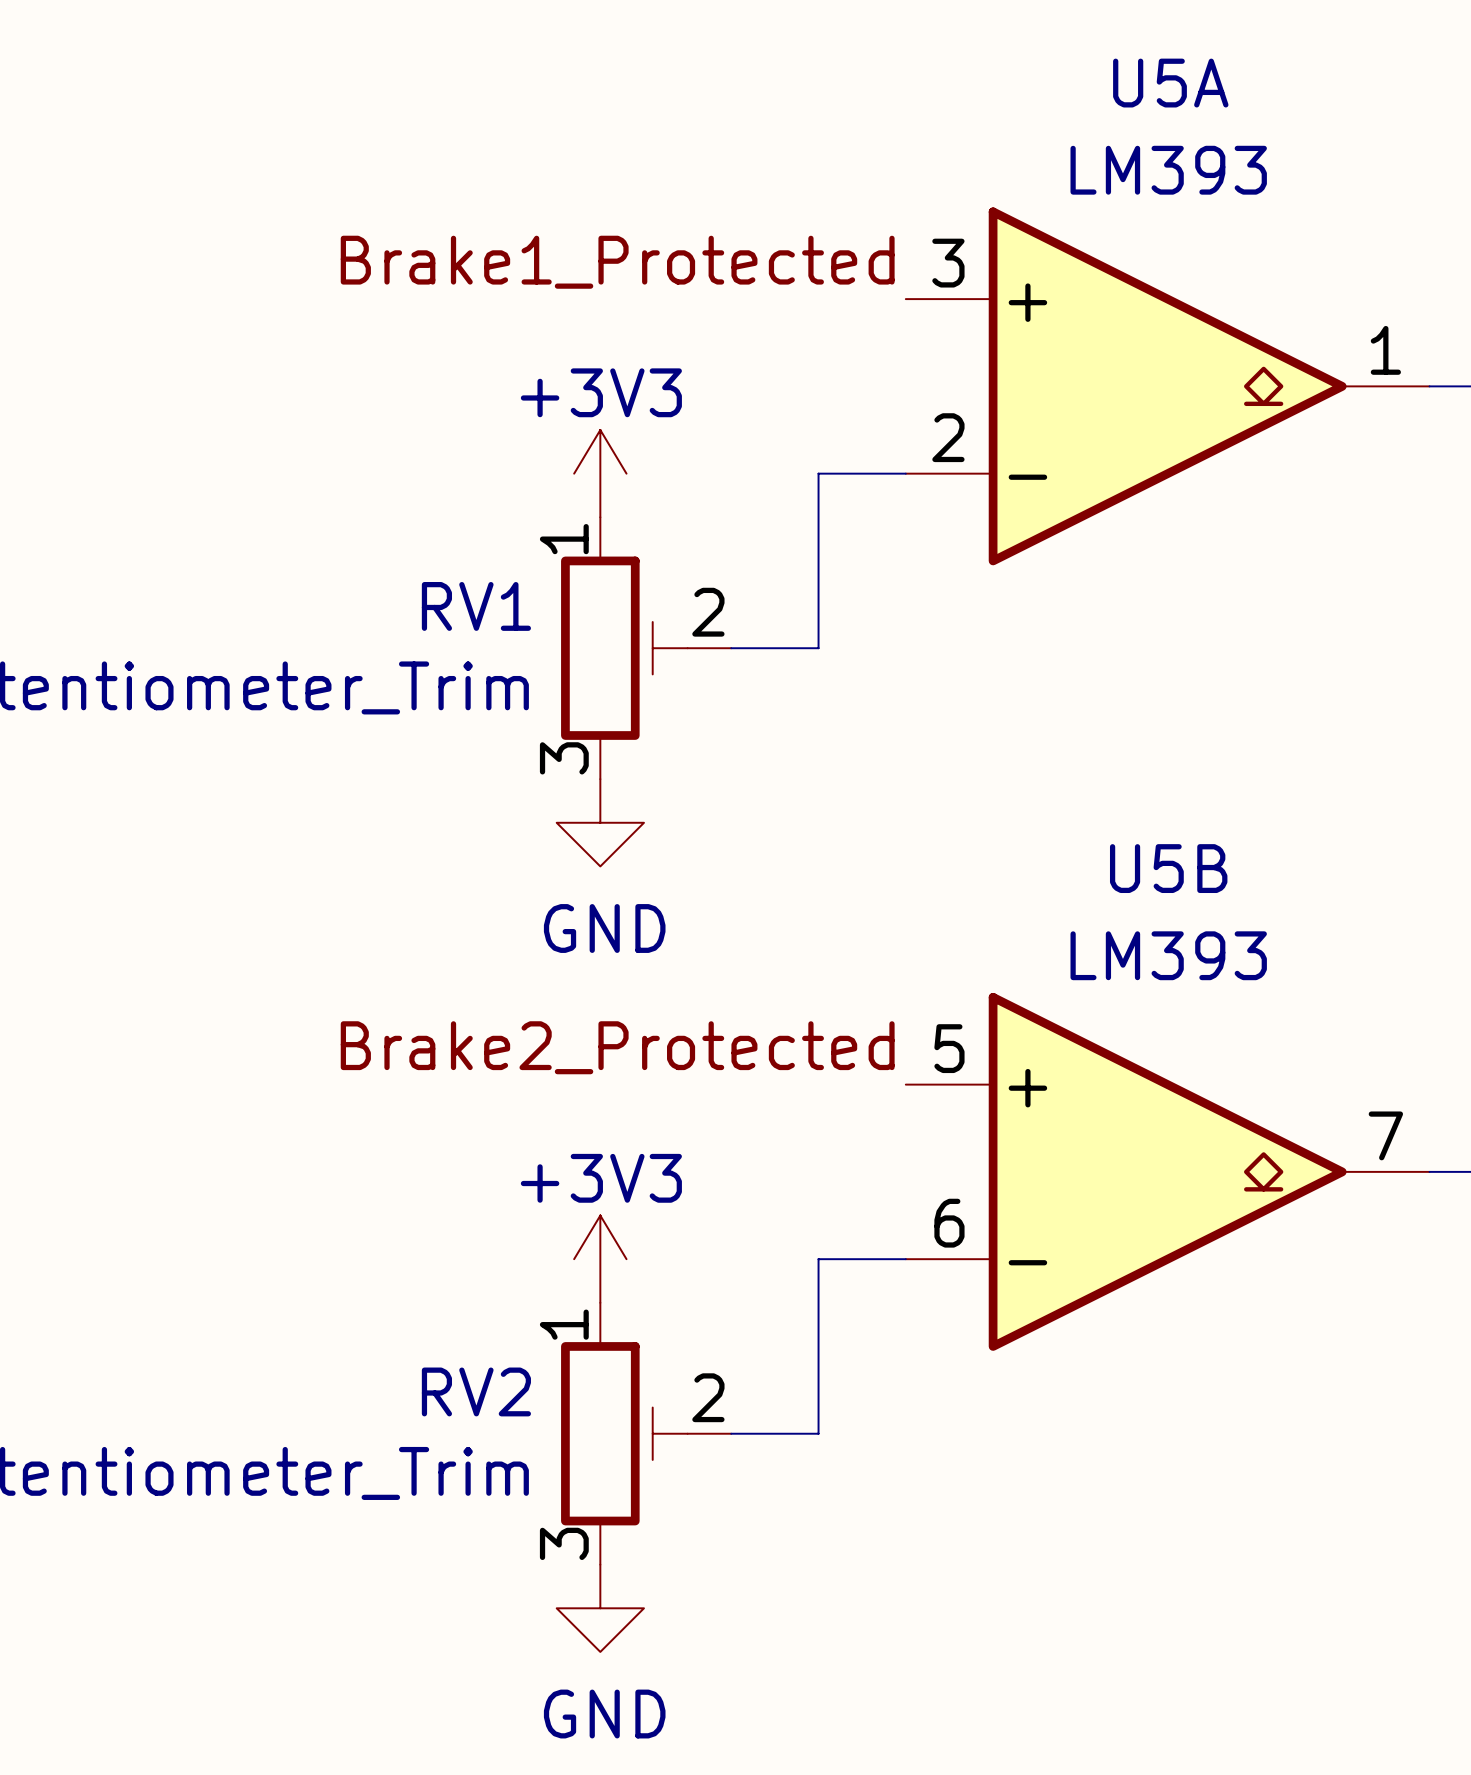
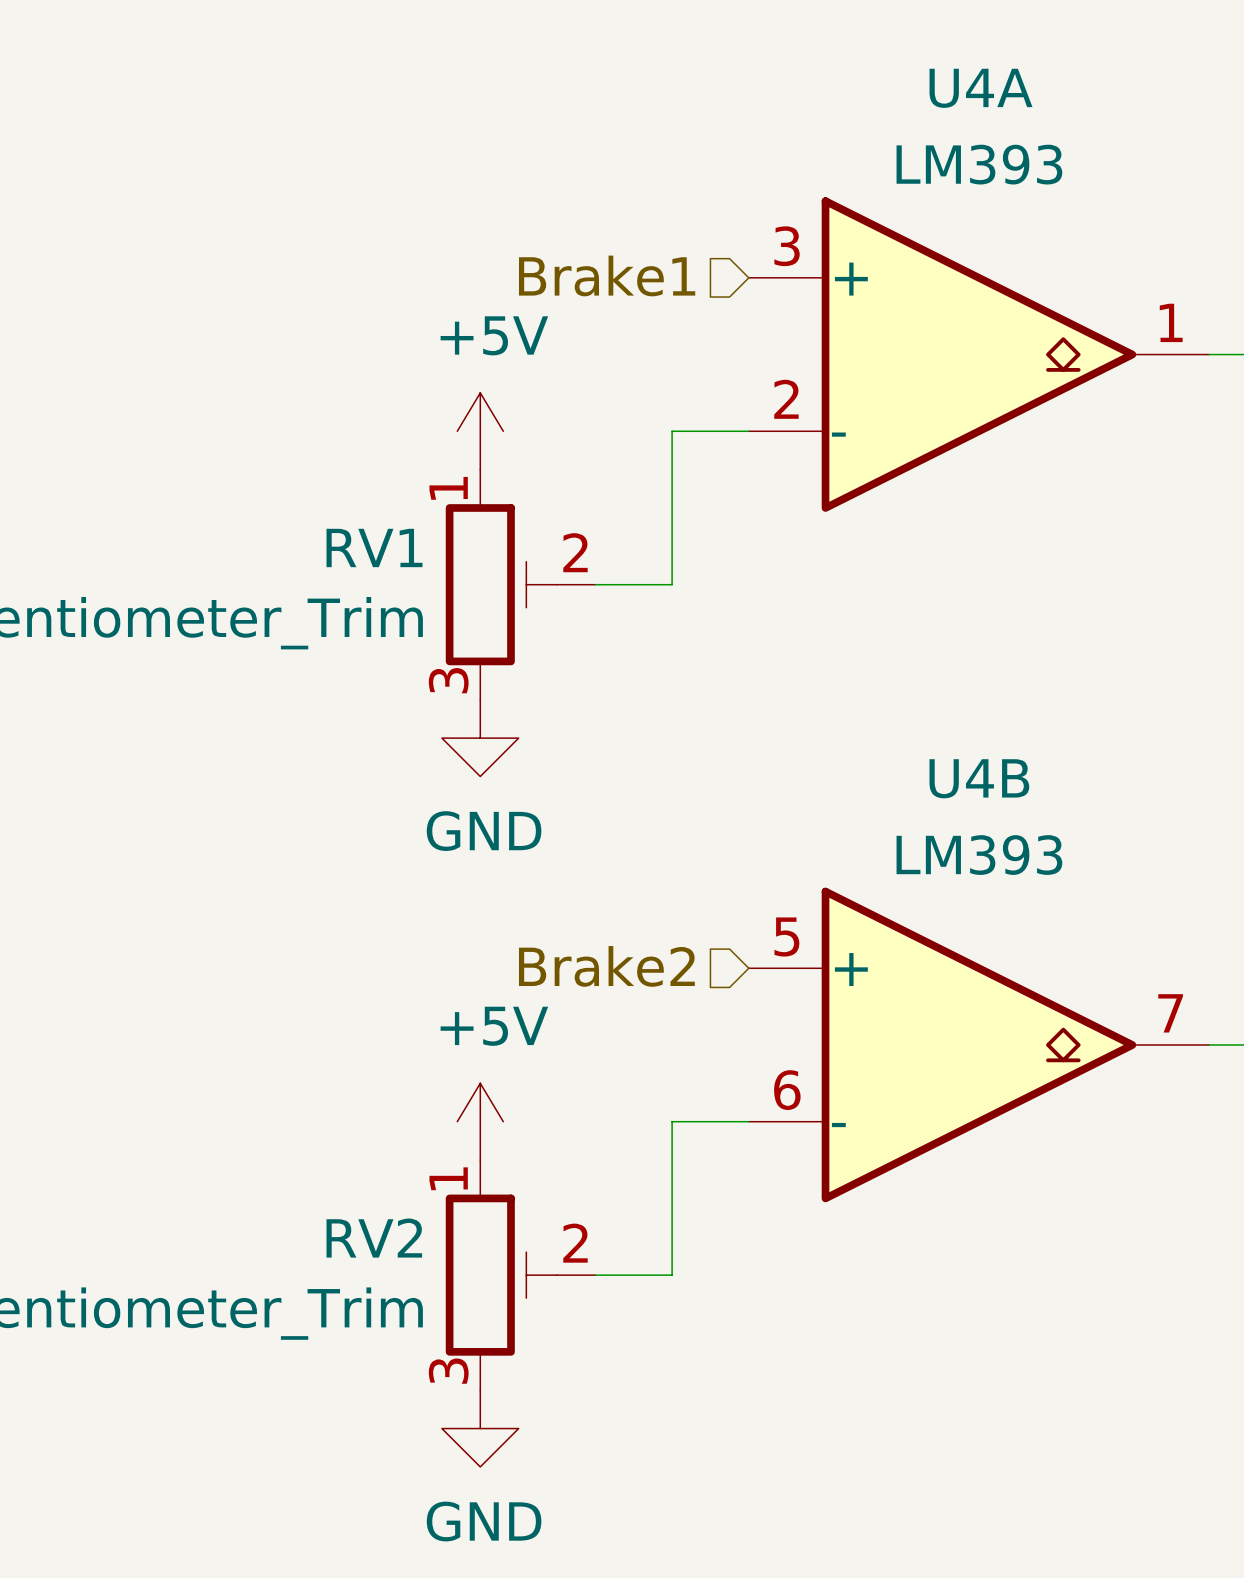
U5A name: U5A (1170, 83) -> U4A (981, 88)
label: Brake1_Protected (617, 262) -> none
hierarchical label: none -> Brake1 (607, 275)
power symbol: +3V3 (600, 473) -> +5V (480, 431)
U5B name: U5B (1168, 868) -> U4B (979, 778)
label: Brake2_Protected (617, 1047) -> none
hierarchical label: none -> Brake2 (606, 966)
power symbol: +3V3 (600, 1259) -> +5V (480, 1121)

